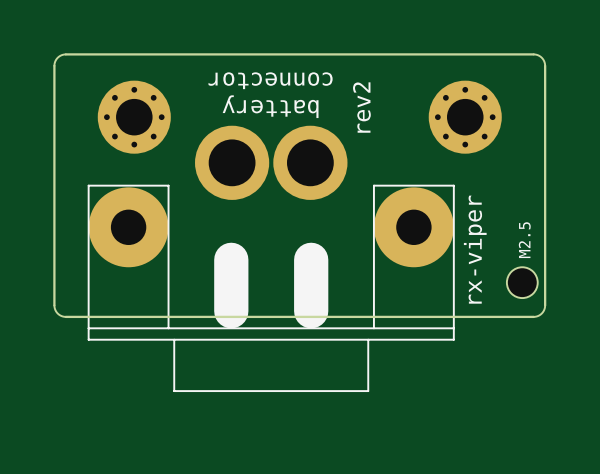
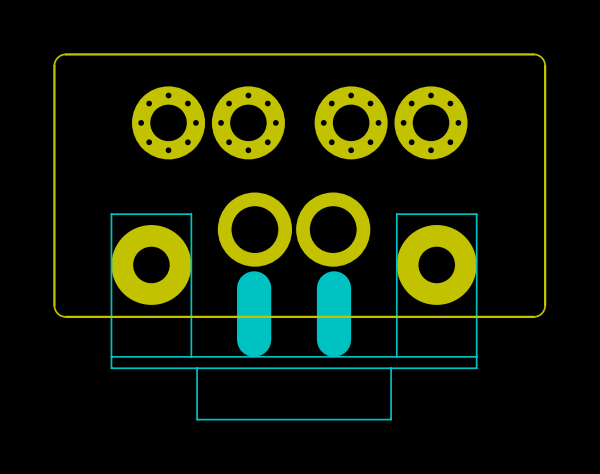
text: connector (270, 80) -> none
text: battery (270, 106) -> none
text: rev2 (361, 107) -> none
part position: (134, 117) -> (168, 122)
part position: (465, 117) -> (431, 122)
part: none -> (248, 122)
part: none -> (351, 122)
text: rx-viper (475, 249) -> none
part: (271, 258) -> none
part: M2.5 (522, 282) -> none
part: none -> (294, 306)

